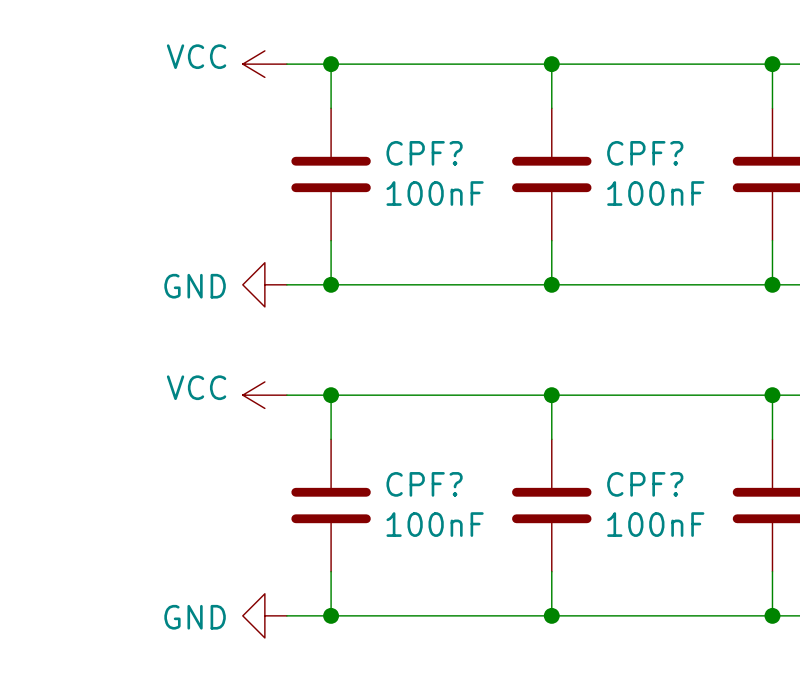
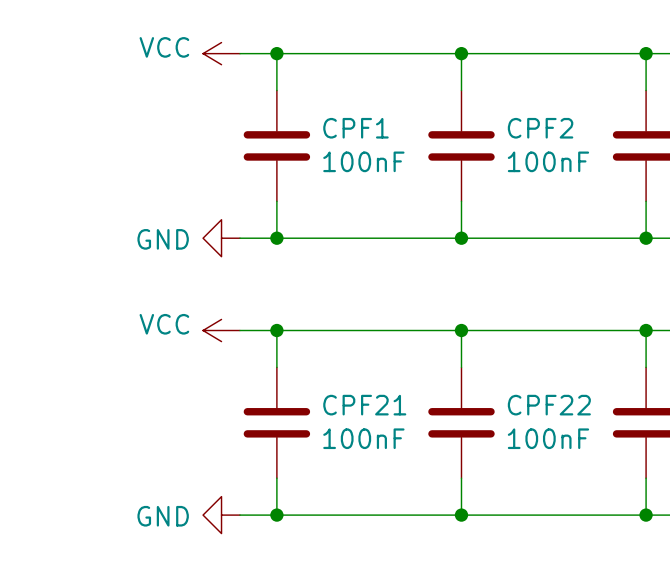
CPF? name: CPF? (424, 153) -> CPF1 (355, 128)
CPF? name: CPF? (645, 153) -> CPF2 (540, 128)
CPF? name: CPF? (424, 484) -> CPF21 (364, 405)
CPF? name: CPF? (645, 484) -> CPF22 (549, 405)

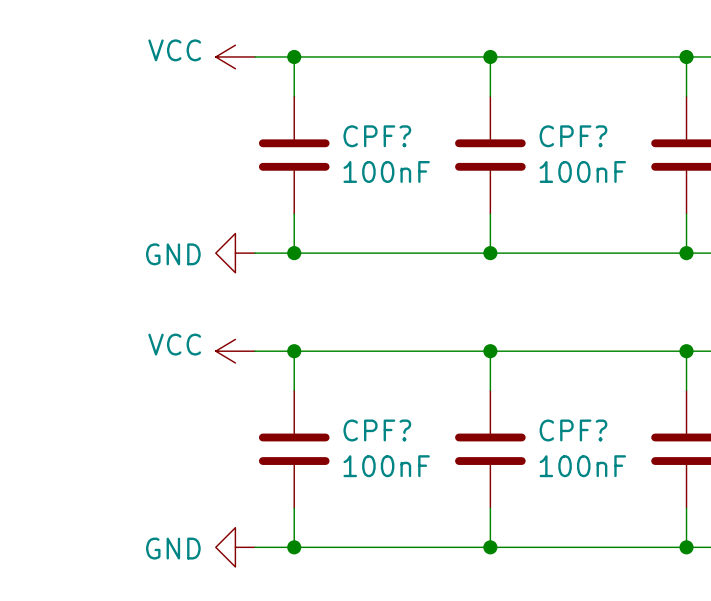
CPF1 name: CPF1 (355, 128) -> CPF? (377, 136)
CPF2 name: CPF2 (540, 128) -> CPF? (573, 136)
CPF21 name: CPF21 (364, 405) -> CPF? (377, 430)
CPF22 name: CPF22 (549, 405) -> CPF? (573, 430)

